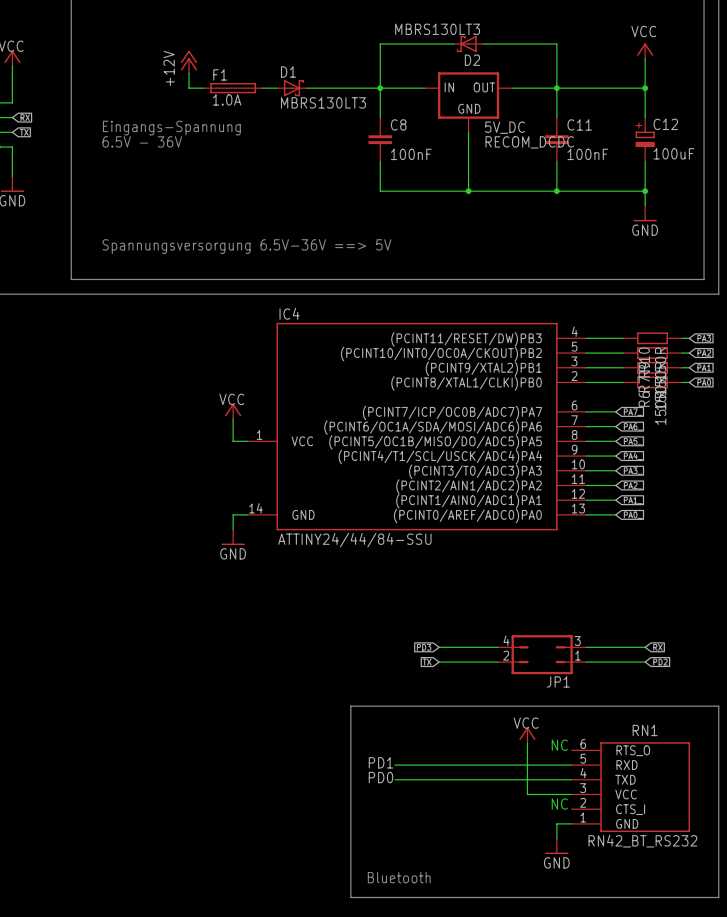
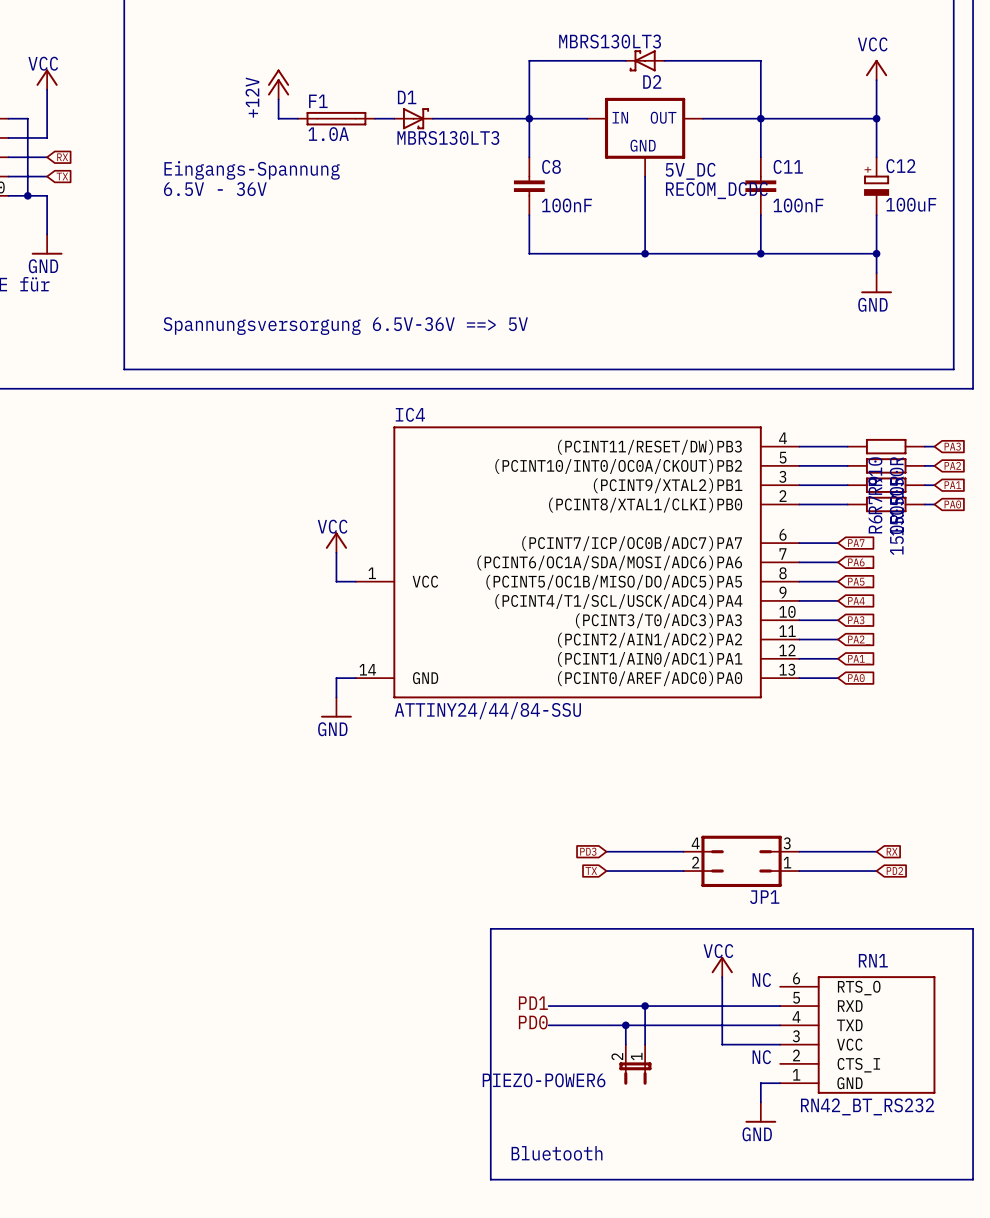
wire: none -> (645, 1006) (645, 1044)
junction: none -> (645, 1006)
wire: none -> (625, 1025) (625, 1044)
junction: none -> (625, 1025)
PIEZO-POWER6: none -> (635, 1064)

